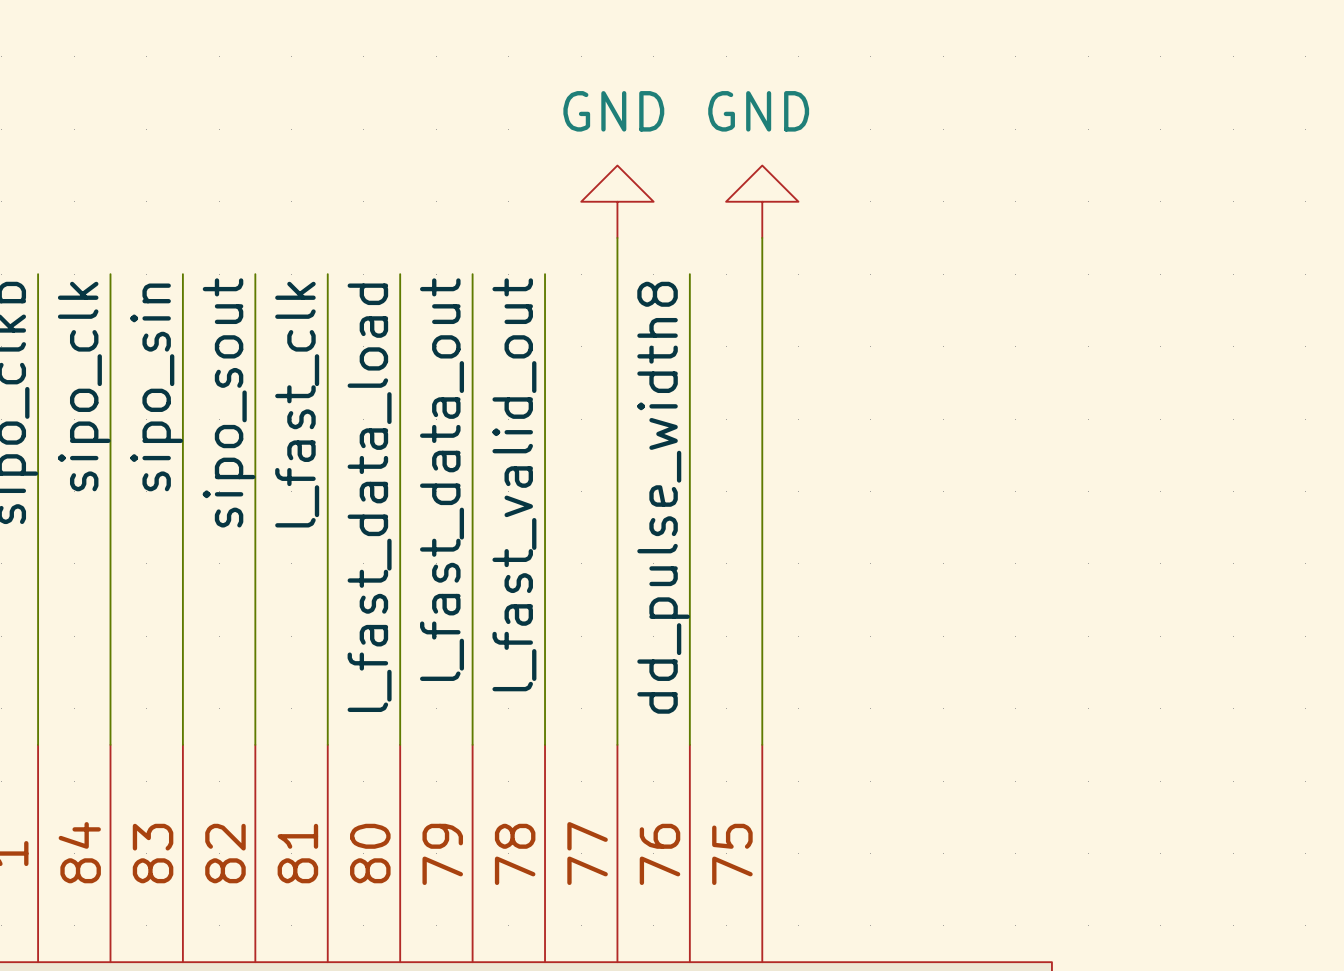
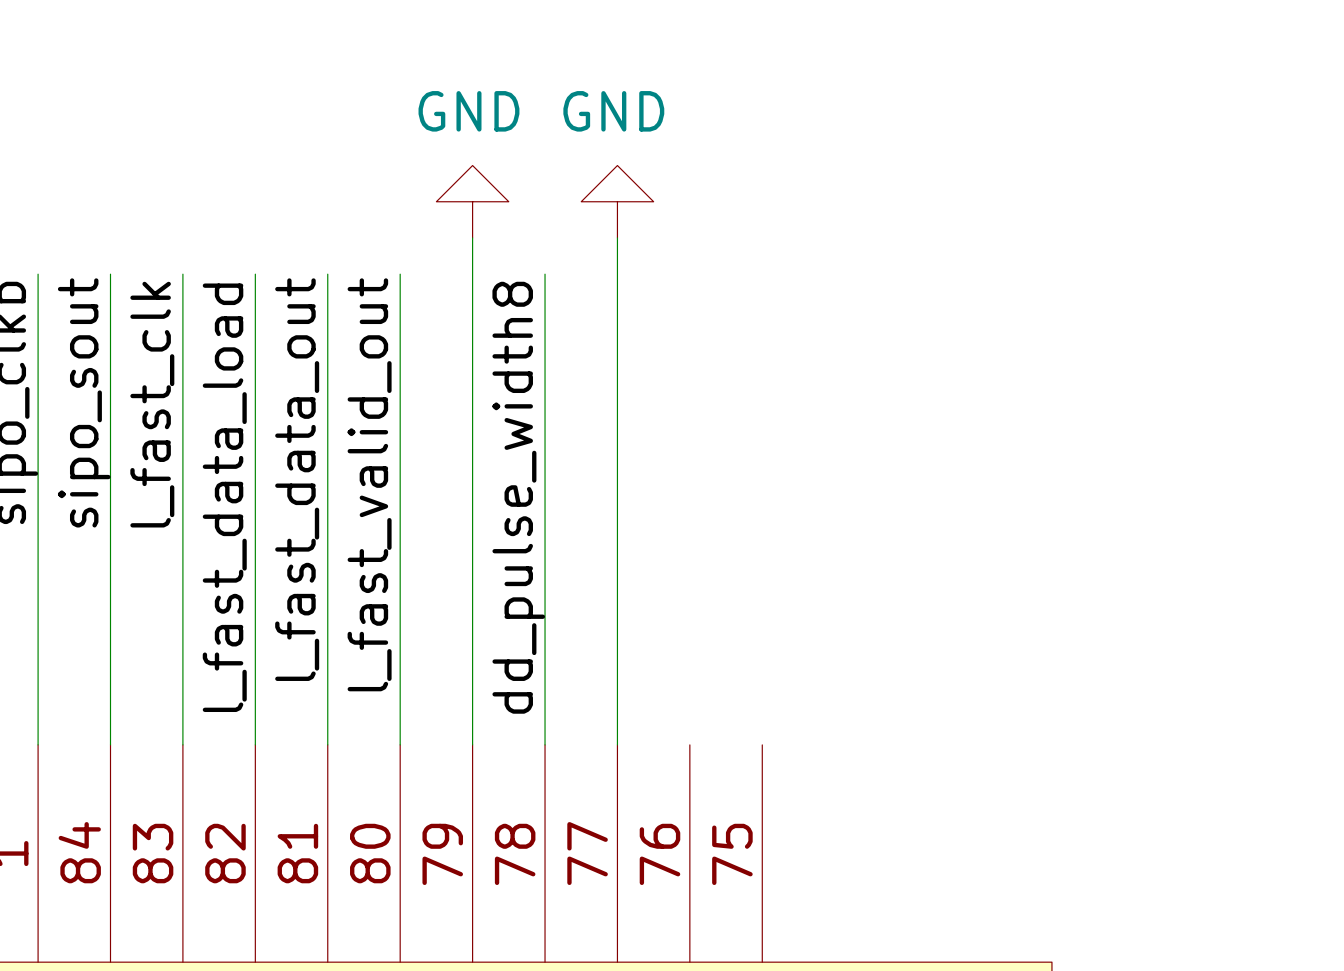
power symbol position: GND (762, 201) -> GND (472, 201)
wire: none -> (472, 237) (472, 274)
wire: (762, 237) (762, 744) -> none
wire: (689, 274) (689, 744) -> none
label: sipo_clk (84, 386) -> sipo_sout (84, 402)
label: sipo_sin (156, 387) -> l_fast_clk (152, 404)
label: sipo_sout (229, 402) -> l_fast_data_load (224, 497)
label: l_fast_clk (297, 404) -> l_fast_data_out (297, 479)
label: l_fast_data_out (442, 479) -> none
label: l_fast_valid_out (514, 484) -> dd_pulse_width8 (518, 497)
label: l_fast_data_load (369, 497) -> l_fast_valid_out (369, 484)
label: dd_pulse_width8 (663, 497) -> none

